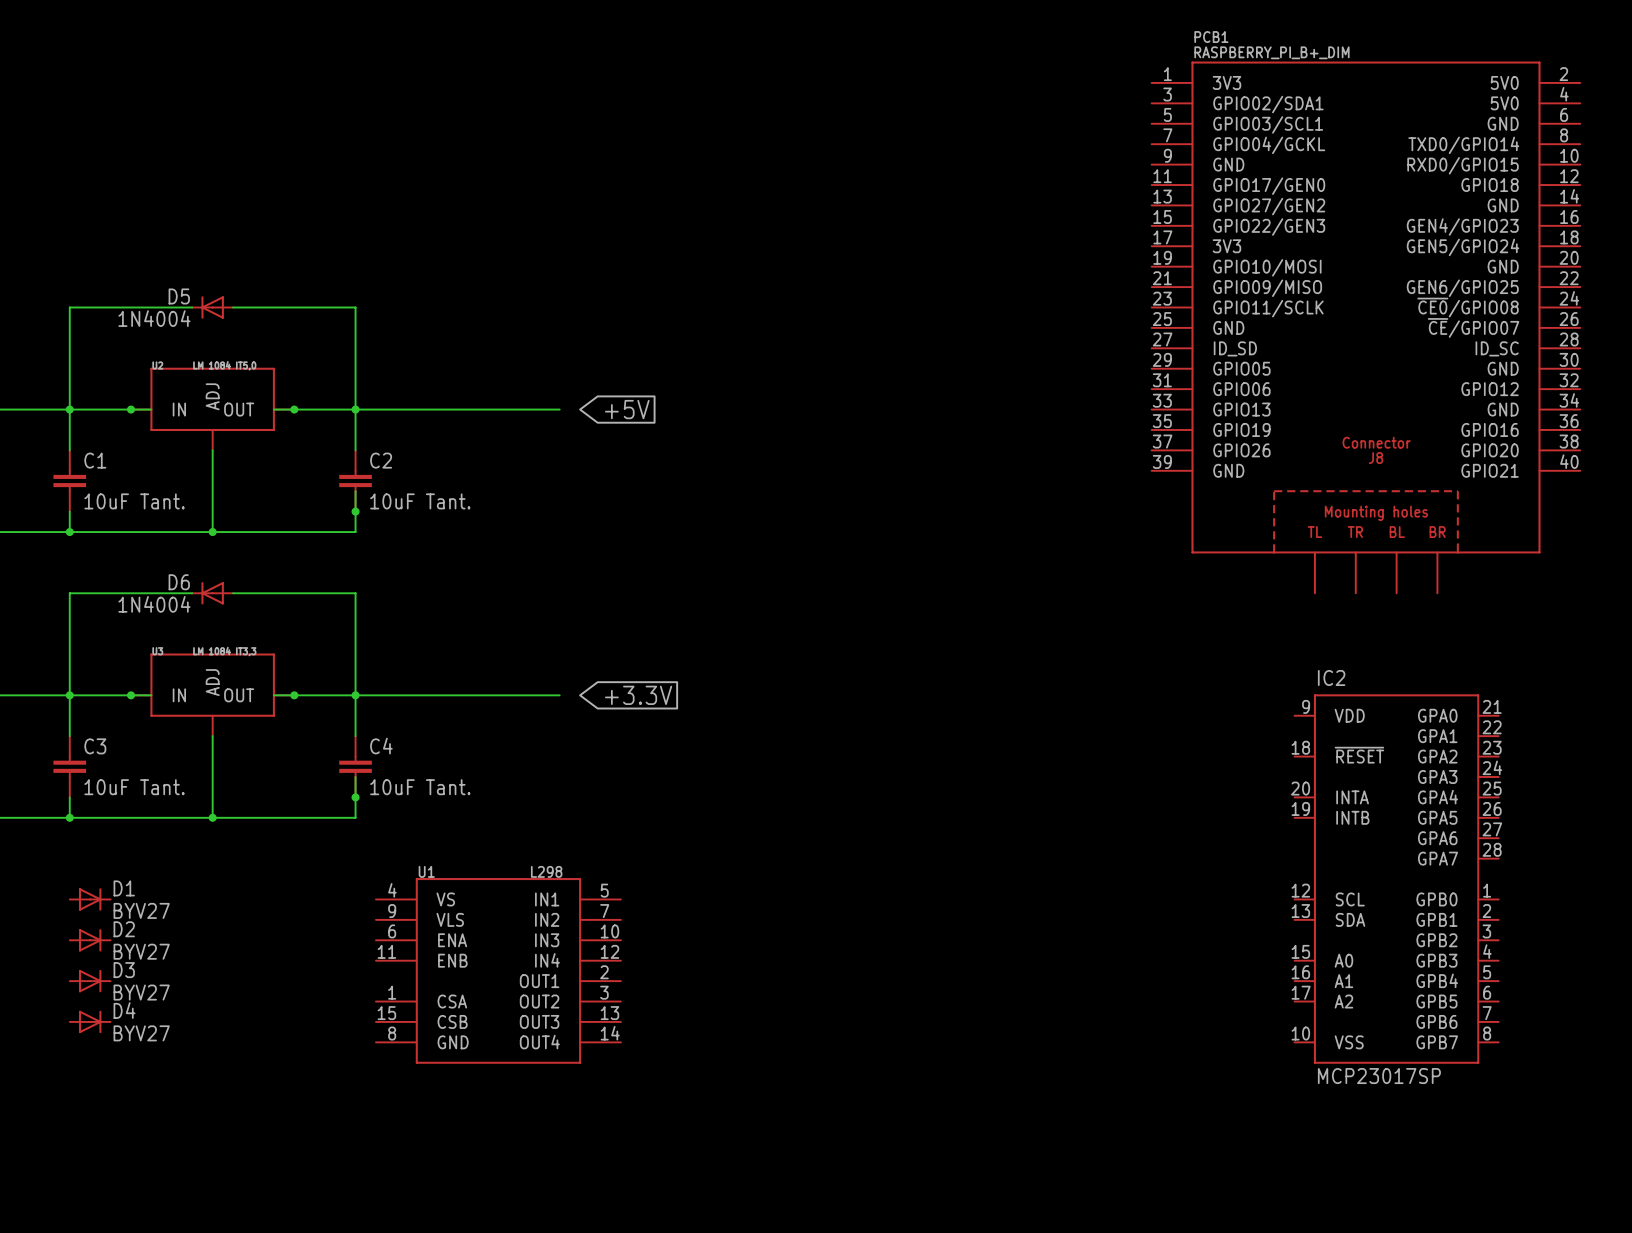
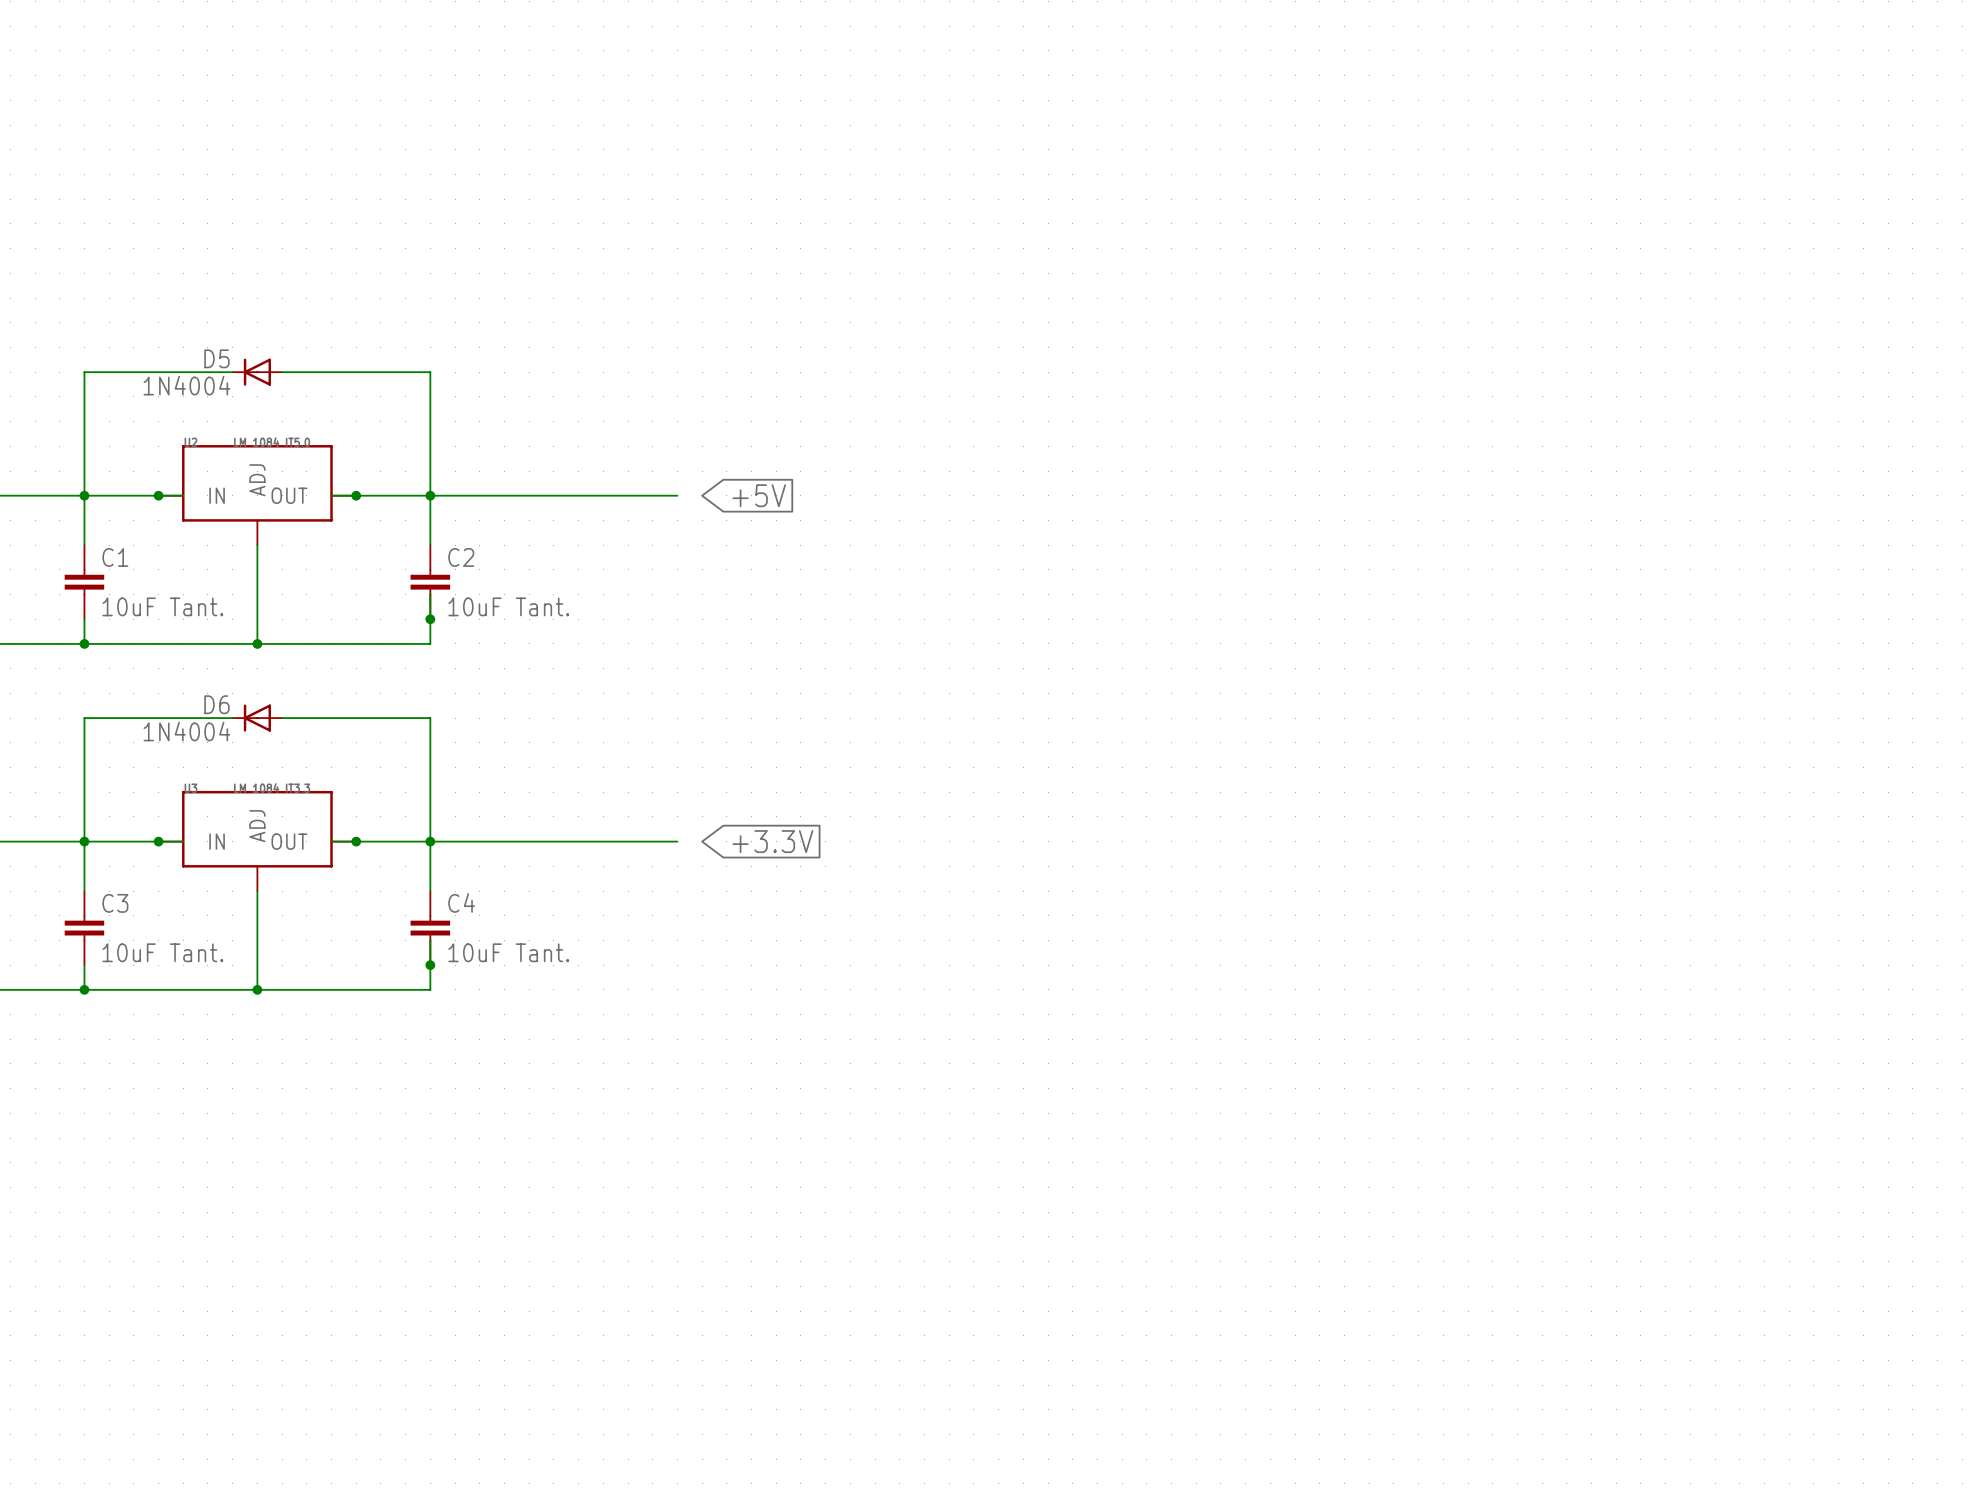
PCB1: RASPBERRY_PI_B+_DIM (1365, 327) -> none
IC2: MCP23017SP (1396, 879) -> none
D1: BYV27 (90, 899) -> none
D2: BYV27 (90, 940) -> none
U1: L298 (498, 970) -> none
D3: BYV27 (90, 981) -> none
D4: BYV27 (90, 1021) -> none

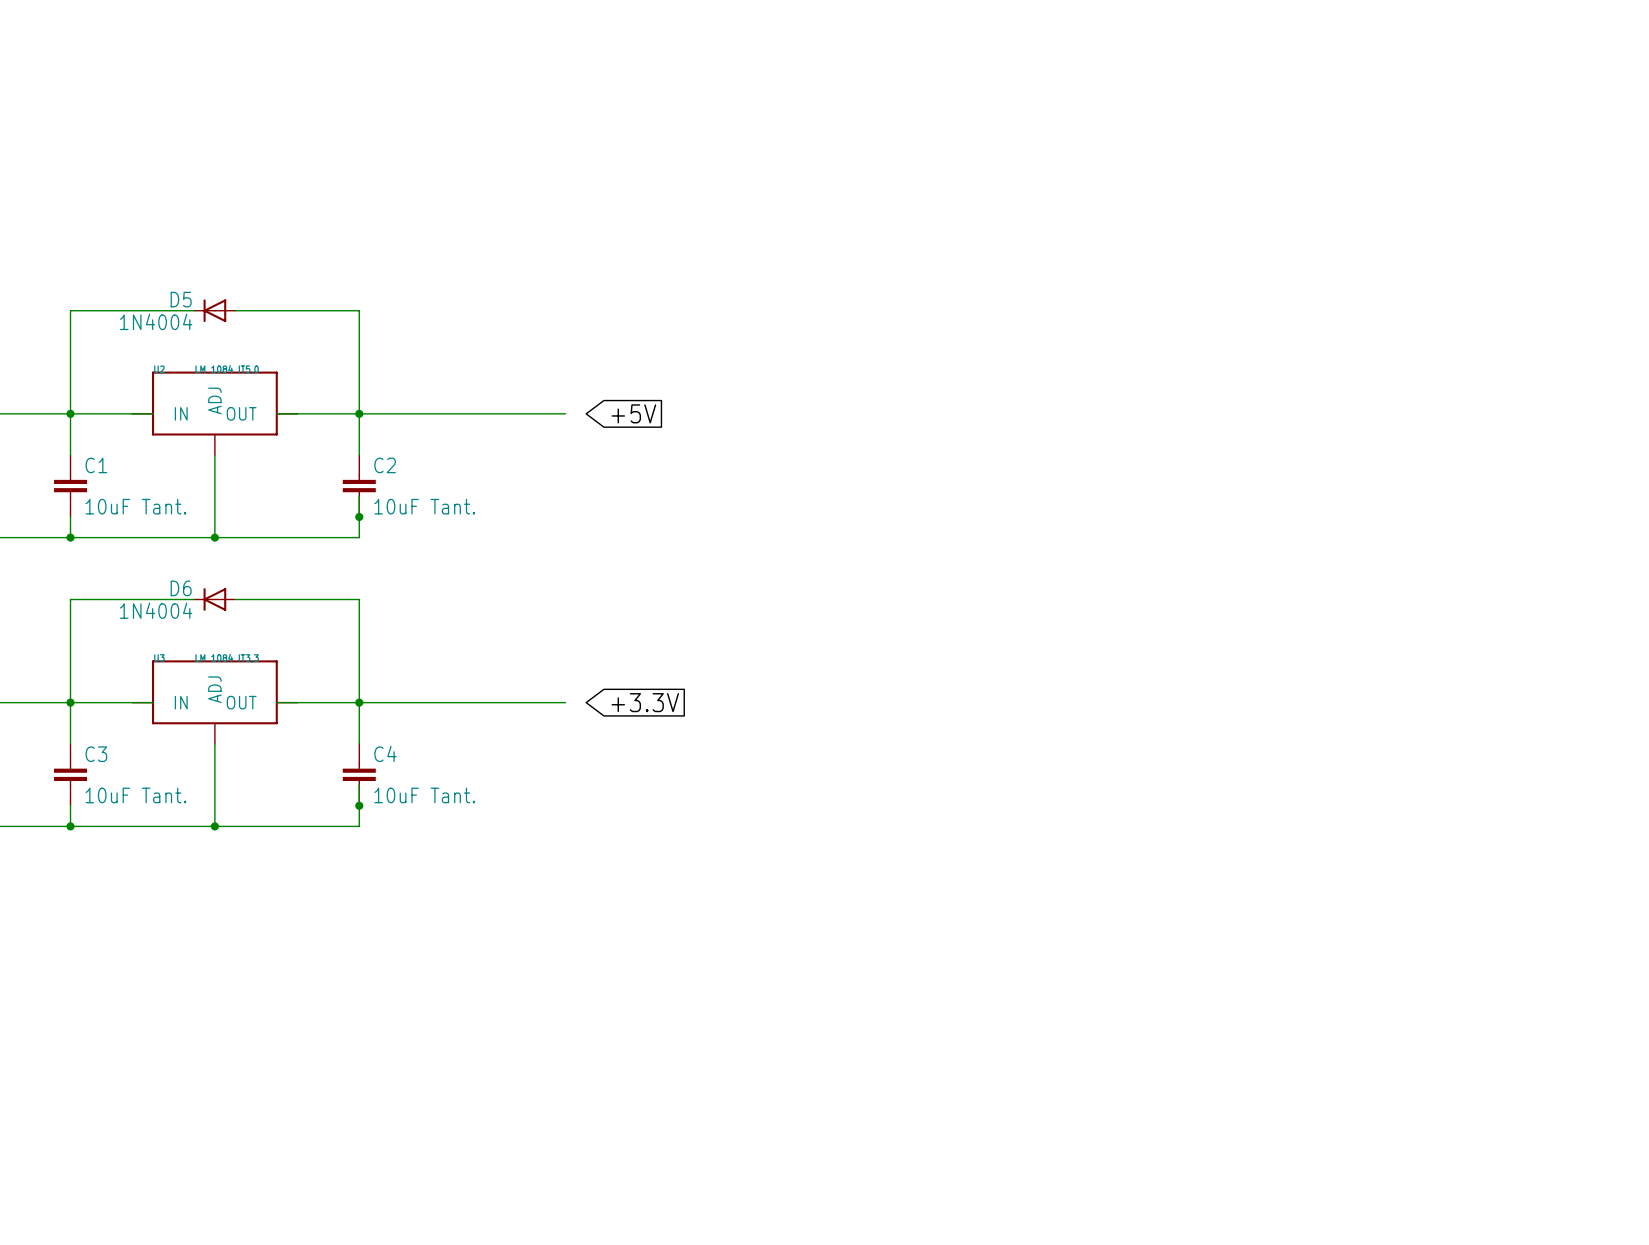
junction: (158, 495) -> none
junction: (356, 495) -> none
junction: (158, 841) -> none
junction: (356, 841) -> none

